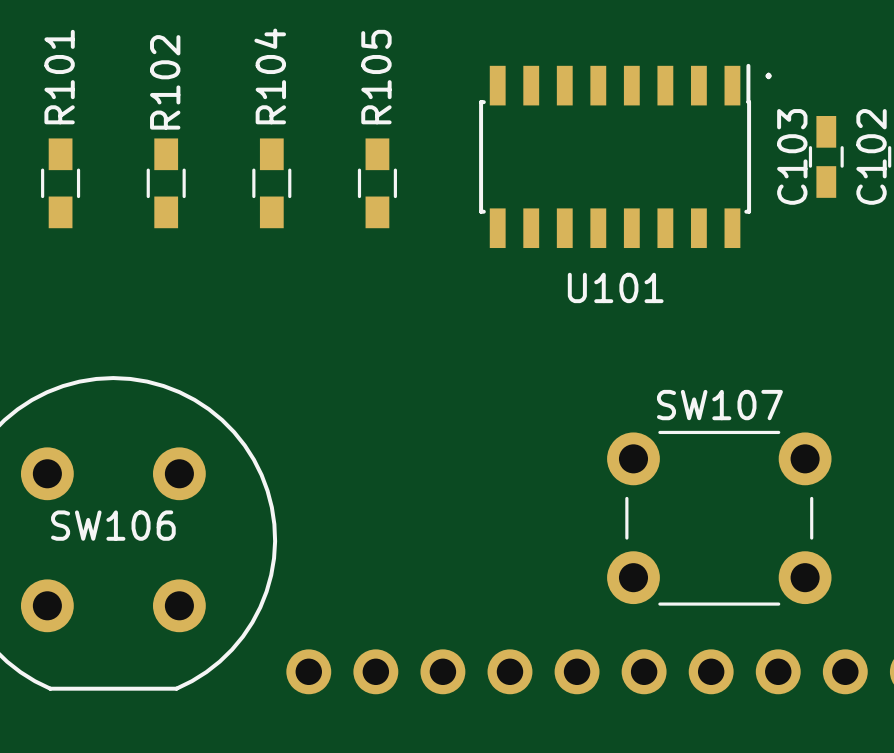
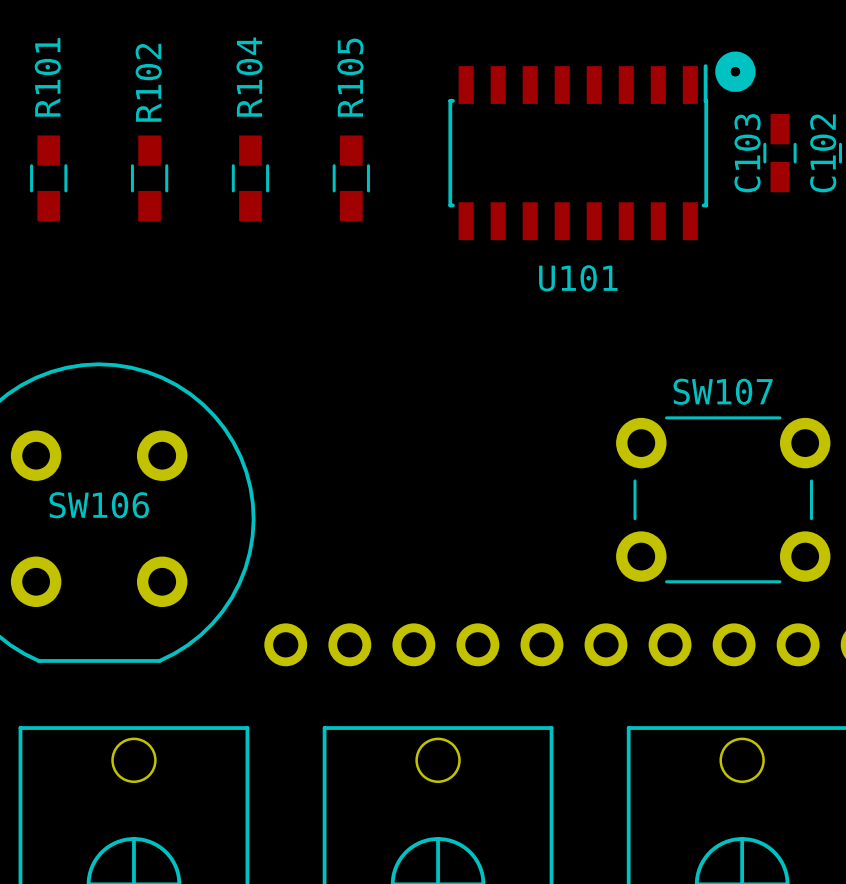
drawing: none -> [715, 51, 756, 92]
text: . (768, 75) -> none
SW107 position: (719, 518) -> (723, 499)

